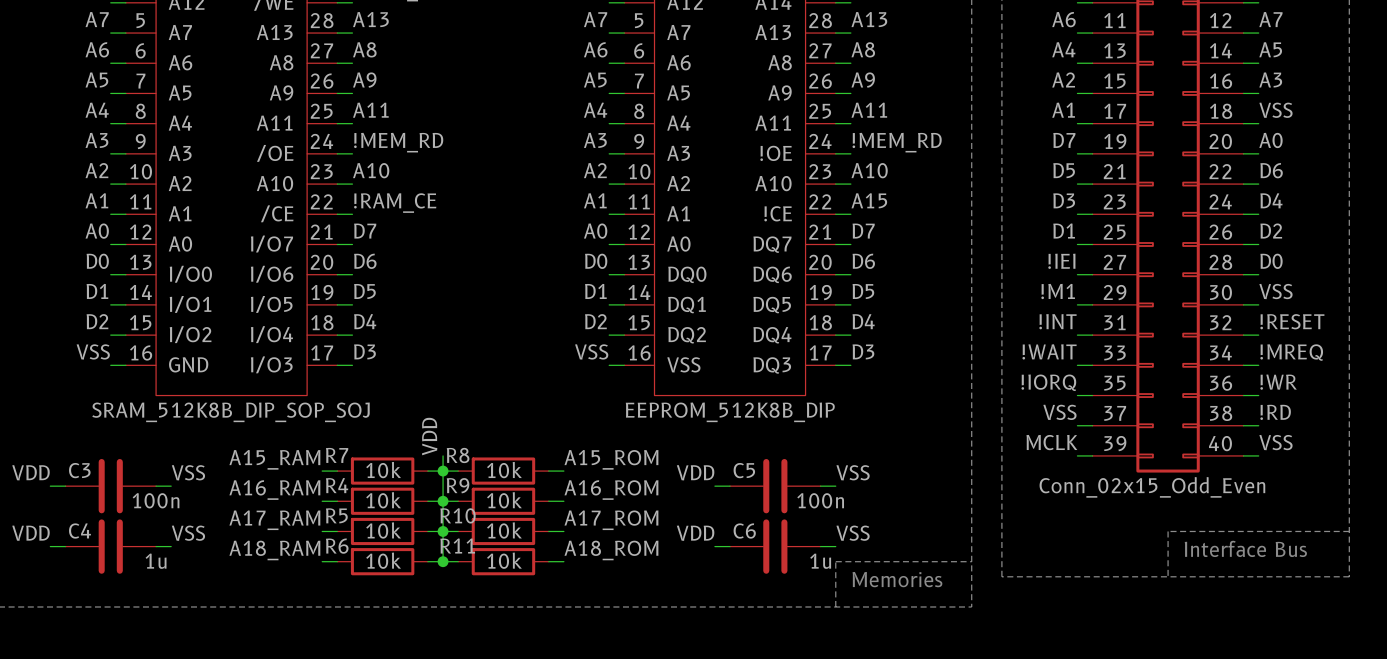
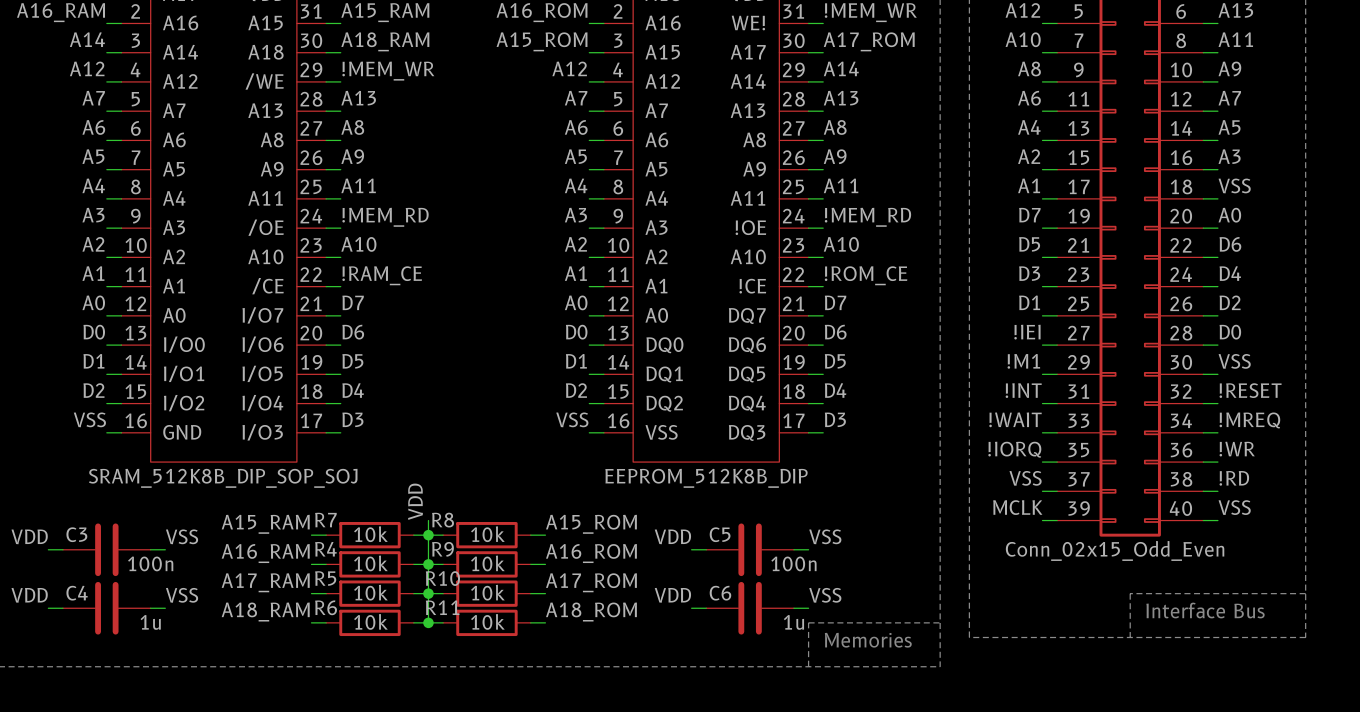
label: A15 (869, 200) -> !ROM_CE (866, 275)

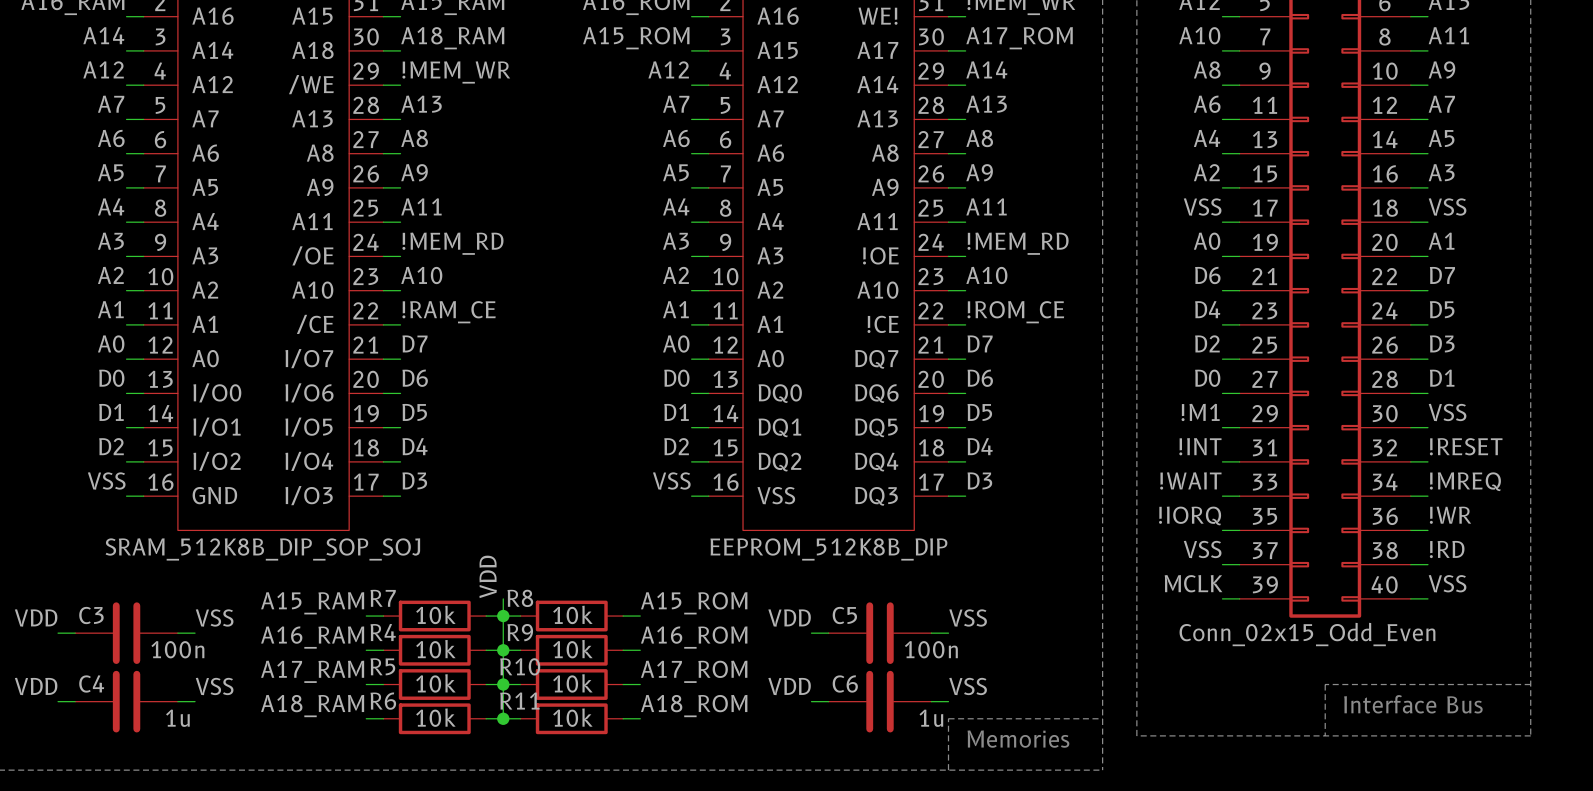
label: A1 (1029, 185) -> VSS (1202, 207)
label: D7 (1029, 215) -> A0 (1207, 241)
label: A0 (1229, 215) -> A1 (1441, 241)
label: D5 (1029, 244) -> D6 (1207, 275)
label: D6 (1230, 244) -> D7 (1442, 275)
label: D3 (1029, 273) -> D4 (1207, 309)
label: D4 (1230, 273) -> D5 (1442, 309)
label: D1 (1029, 302) -> D2 (1207, 343)
label: D2 (1230, 302) -> D3 (1442, 343)
label: !IEI (1027, 332) -> D0 (1207, 378)
label: D0 (1230, 332) -> D1 (1442, 378)

